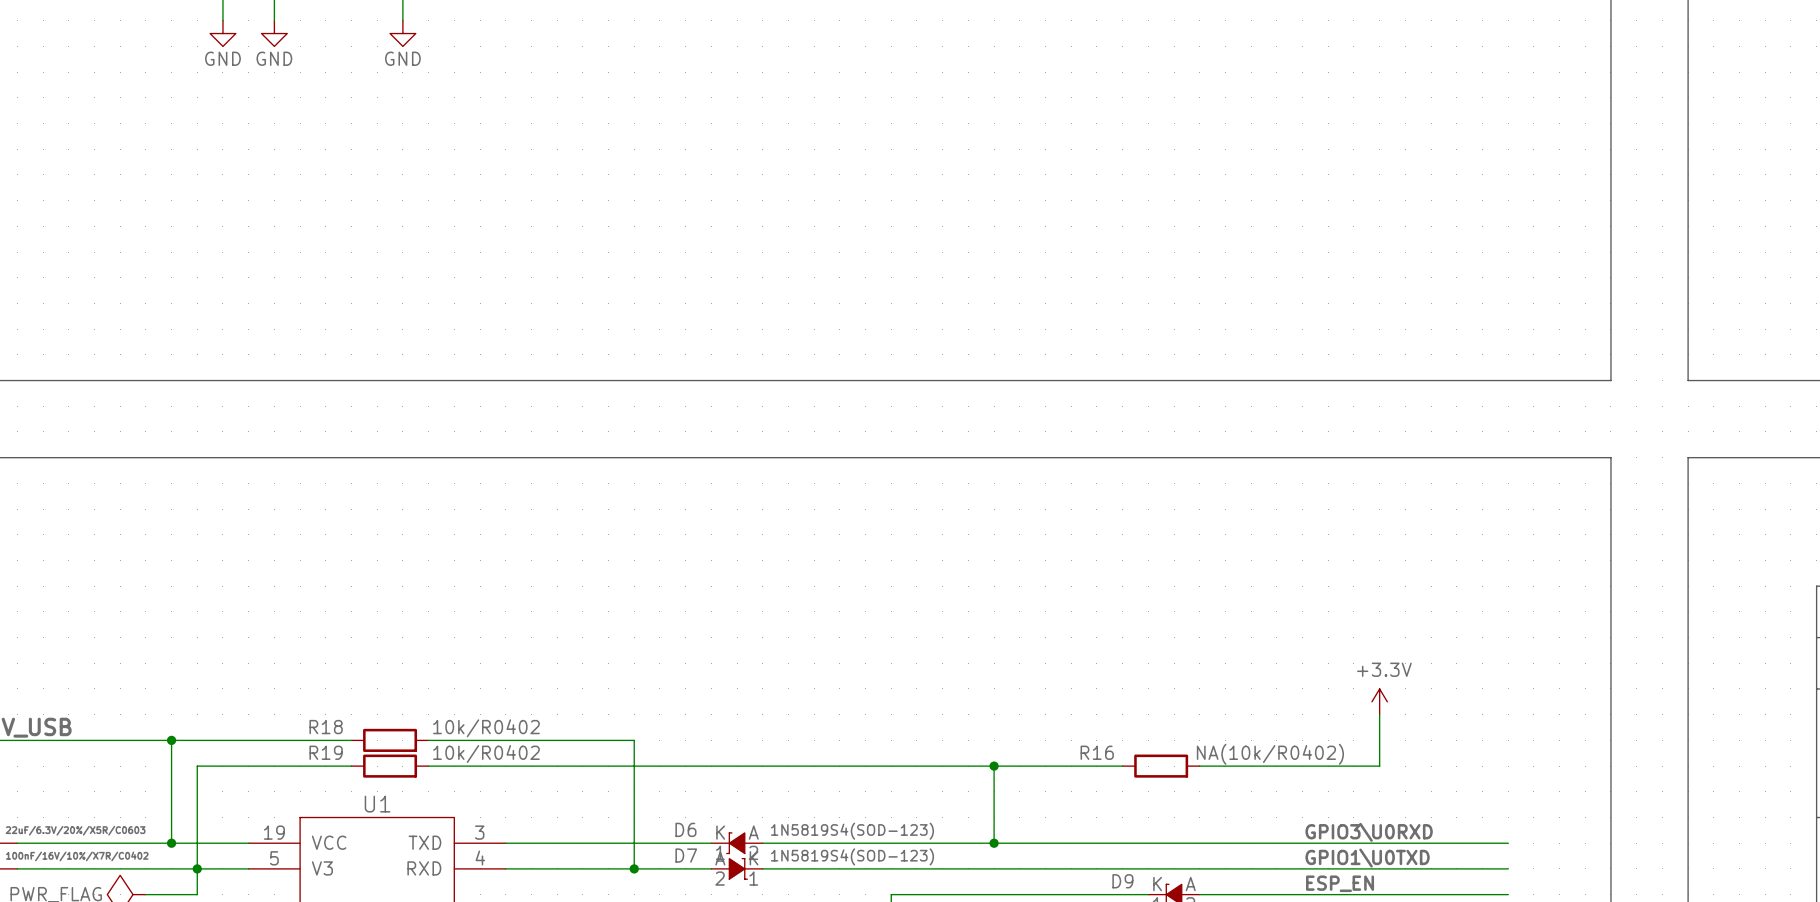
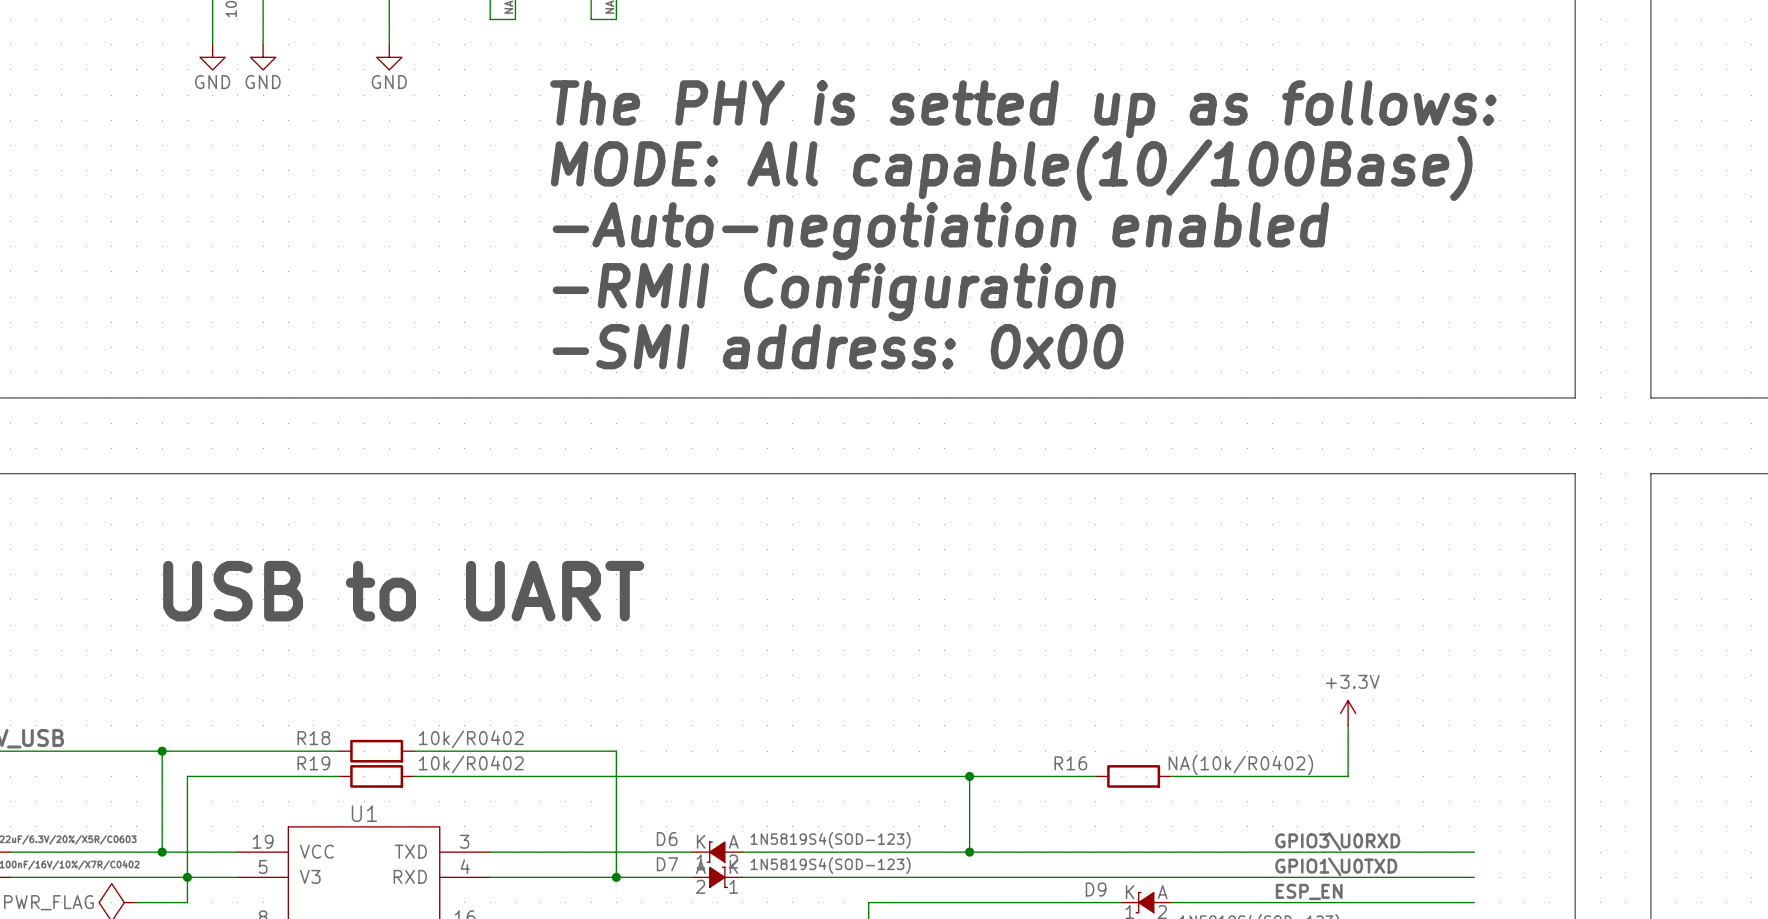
text: none -> The PHY is setted up as follows: (1023, 109)
text: none -> MODE: All capable(10/100Base) (1011, 168)
text: none -> -Auto-negotiation enabled (940, 231)
text: none -> -RMII Configuration (834, 292)
text: none -> -SMI address: 0x00 (838, 346)
text: none -> USB to UART (403, 591)

